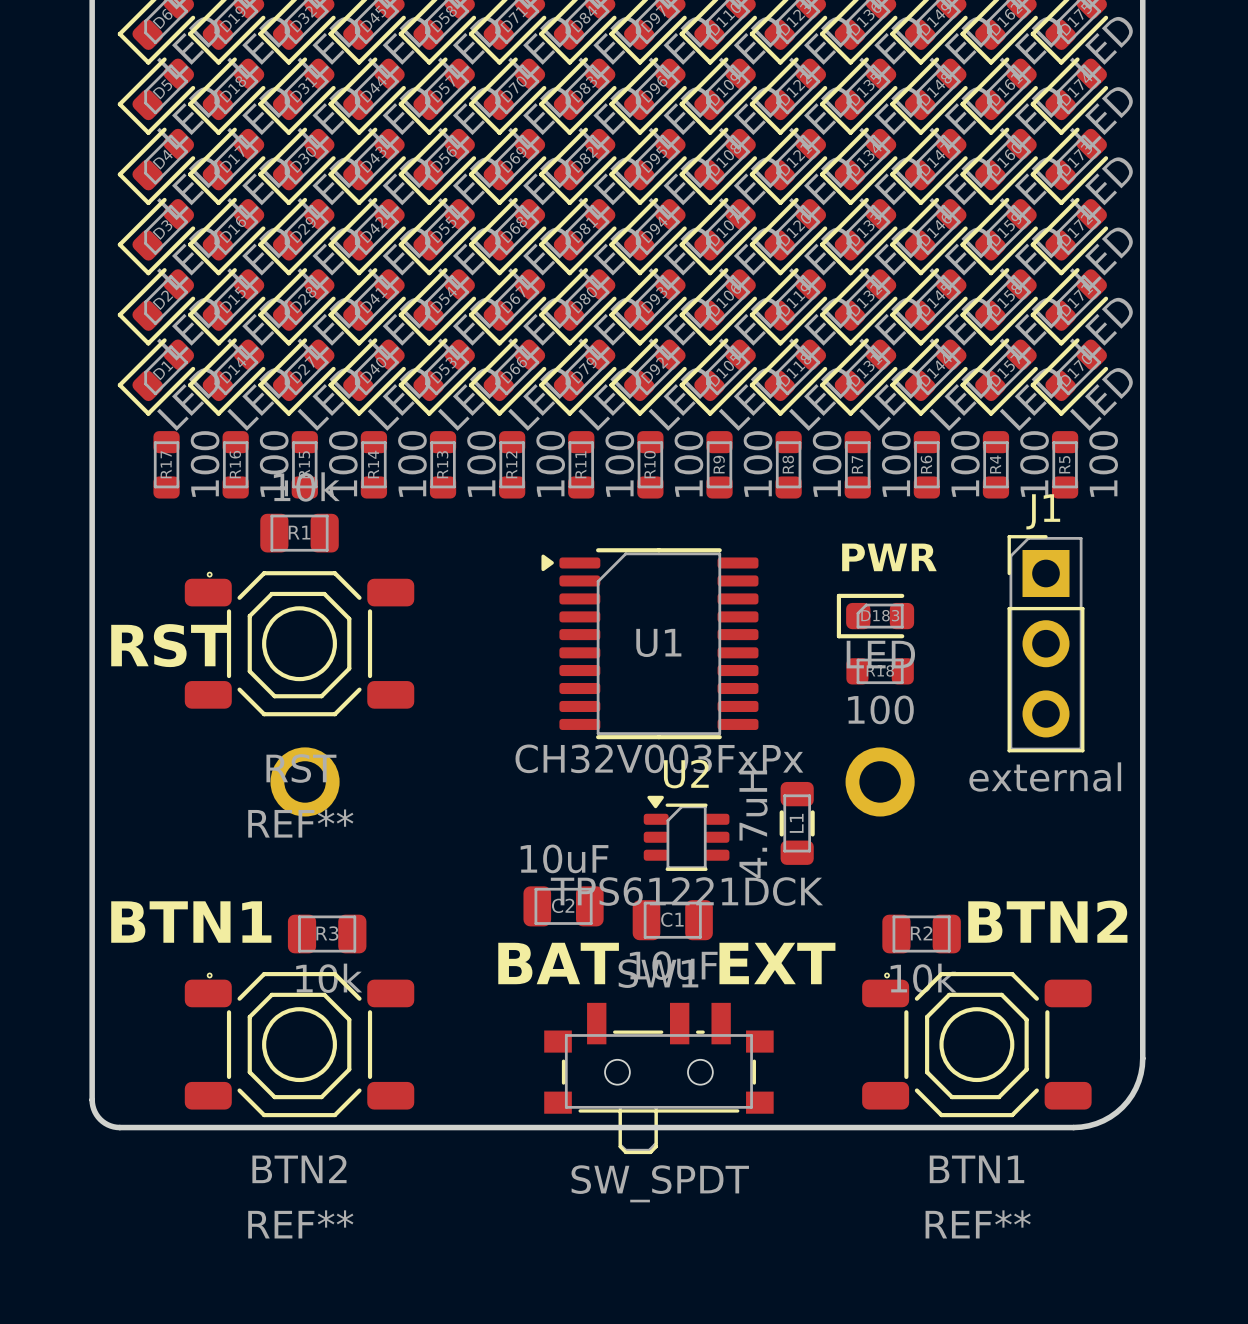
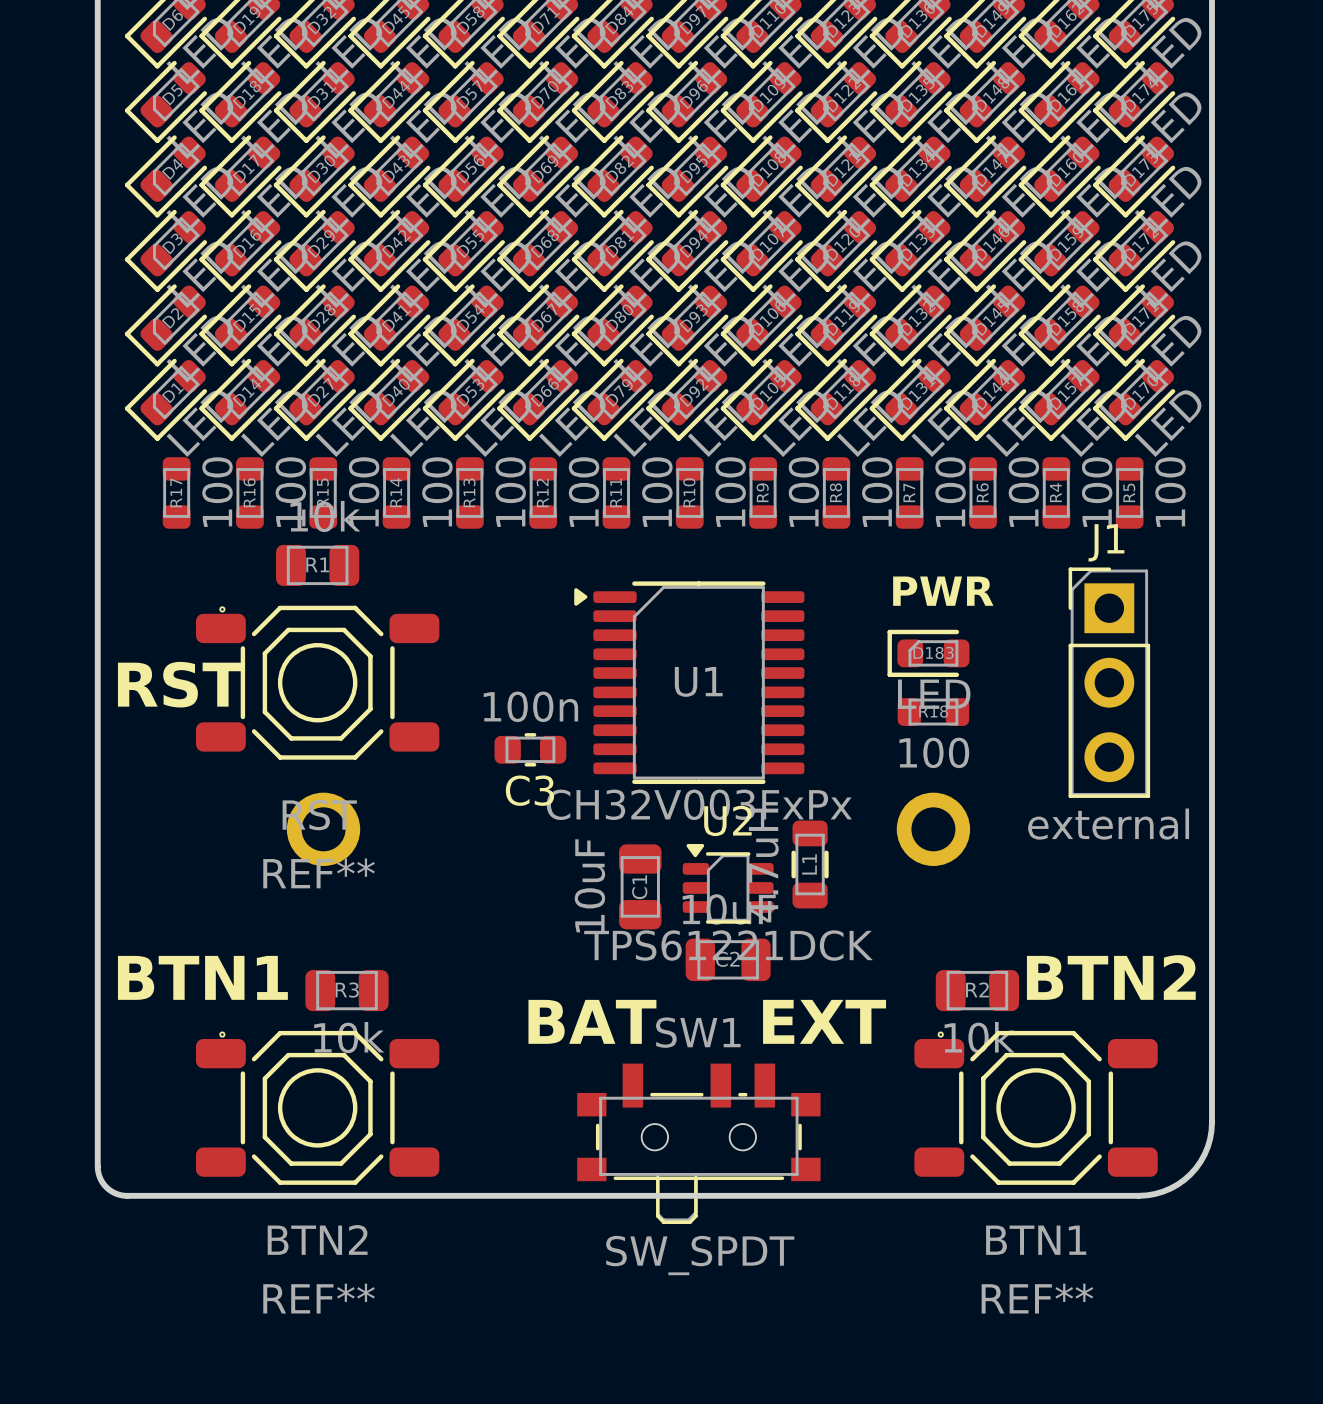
C3: none -> 100n (530, 749)
L1 position: (797, 823) -> (810, 864)
C2 position: (563, 906) -> (728, 959)
C1 rotation: 0° (672, 920) -> 90° clockwise (640, 886)
C1 position: (672, 920) -> (640, 886)

